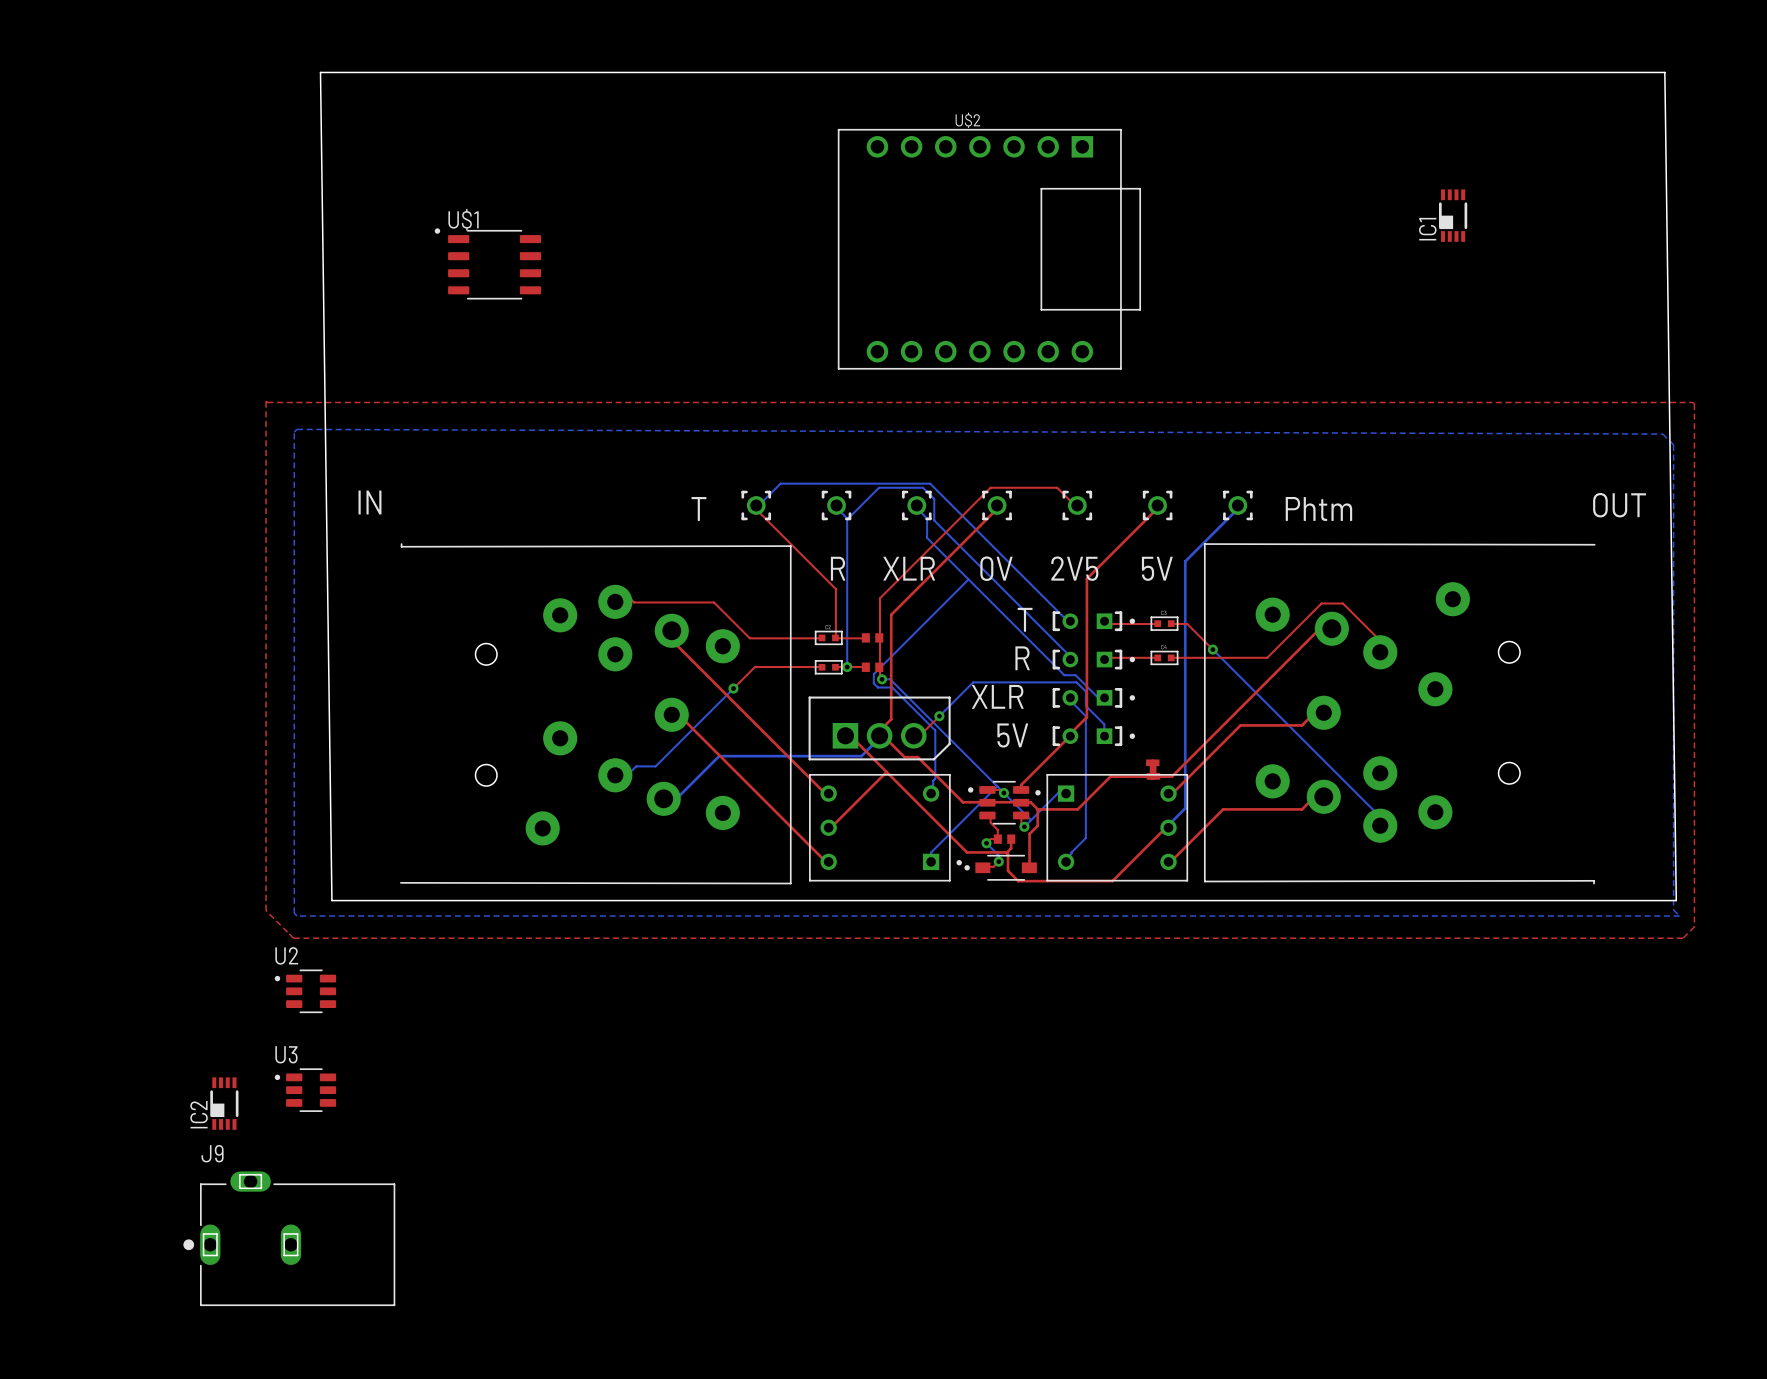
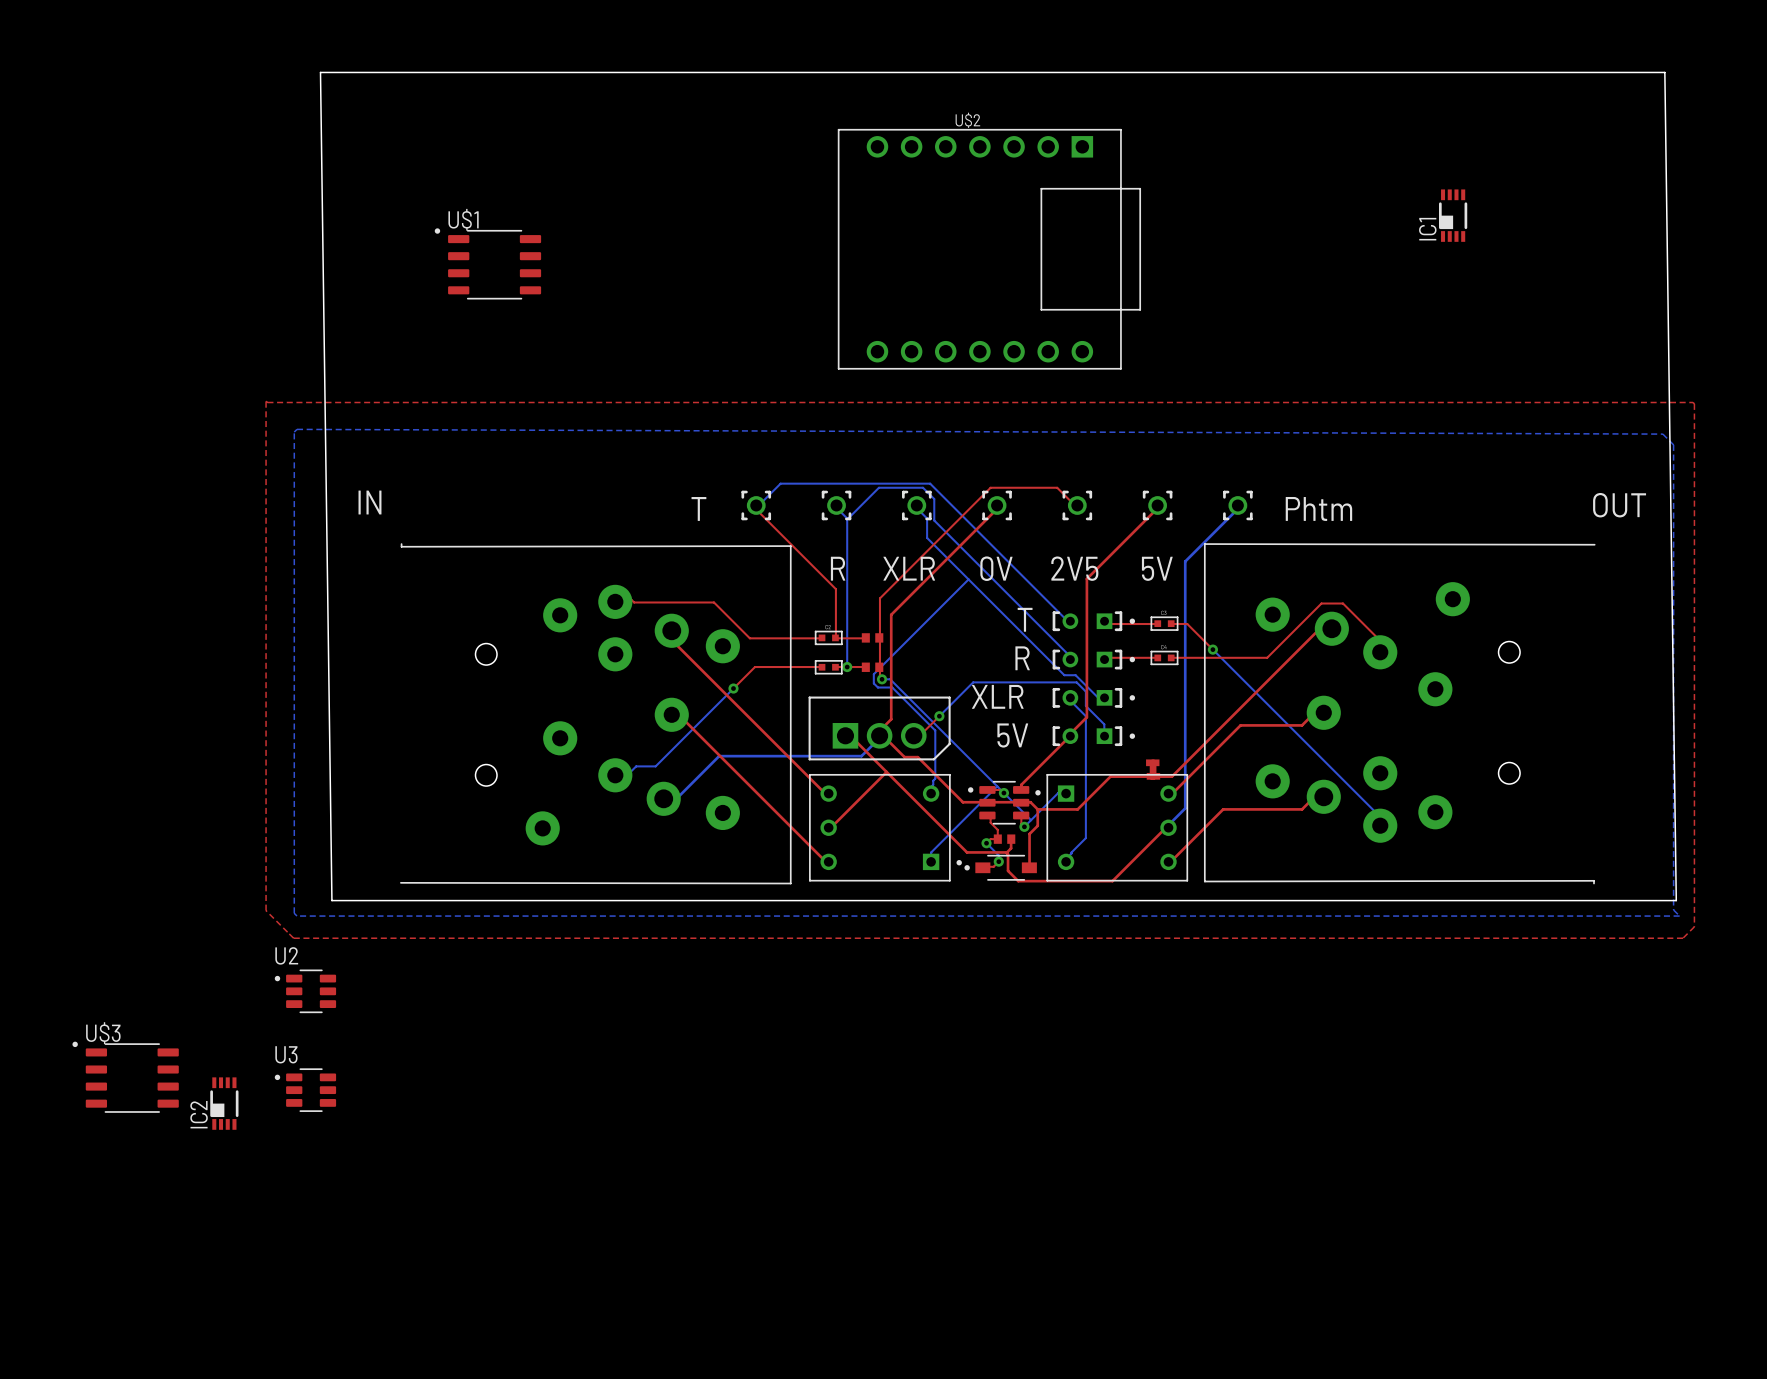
U$3: none -> (125, 1077)
J9: (289, 1238) -> none

